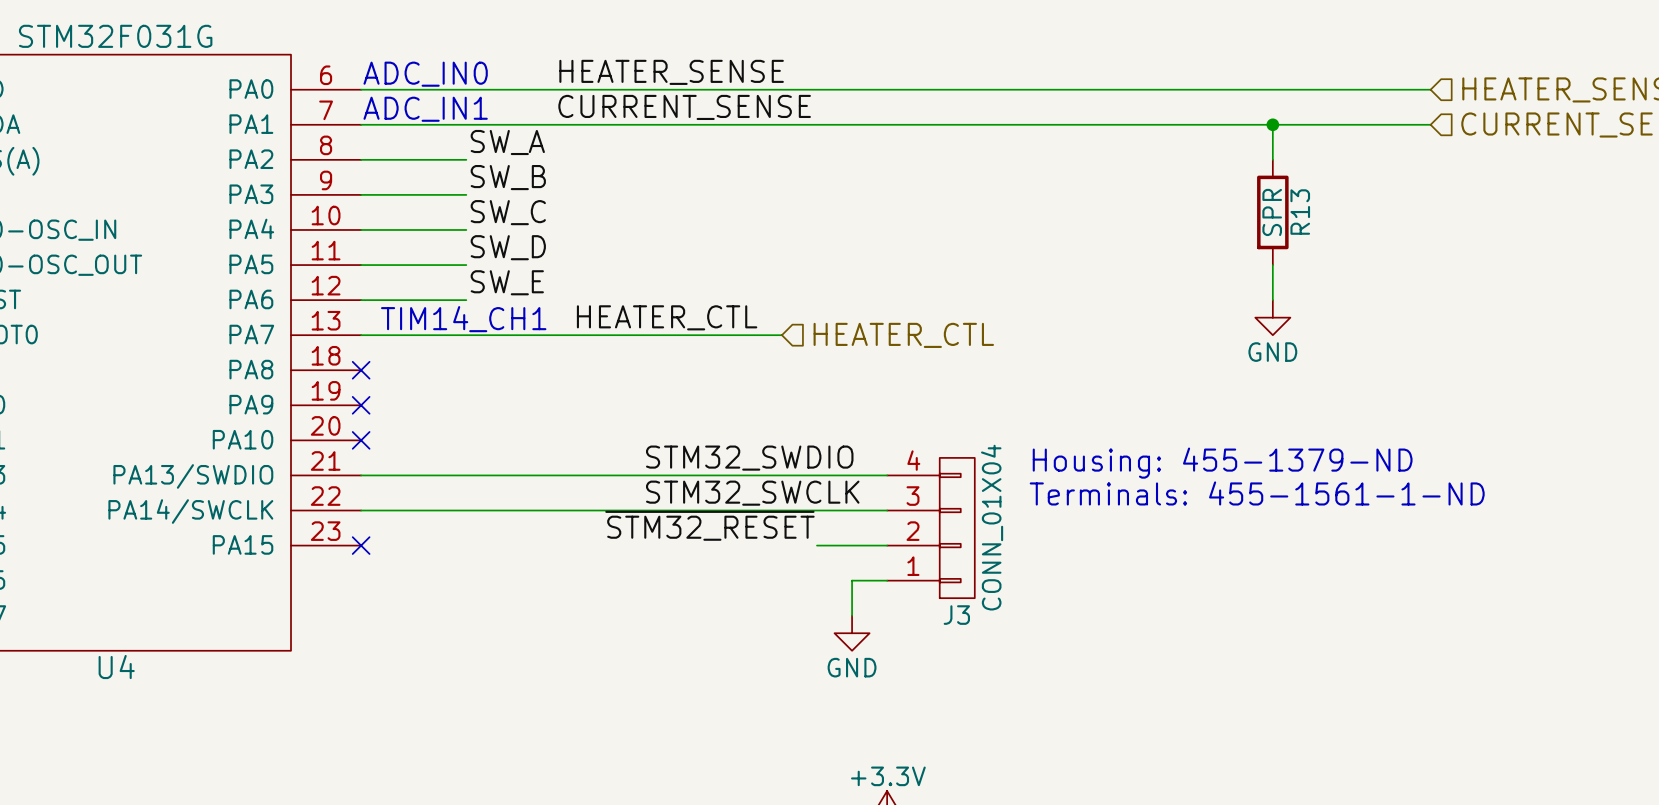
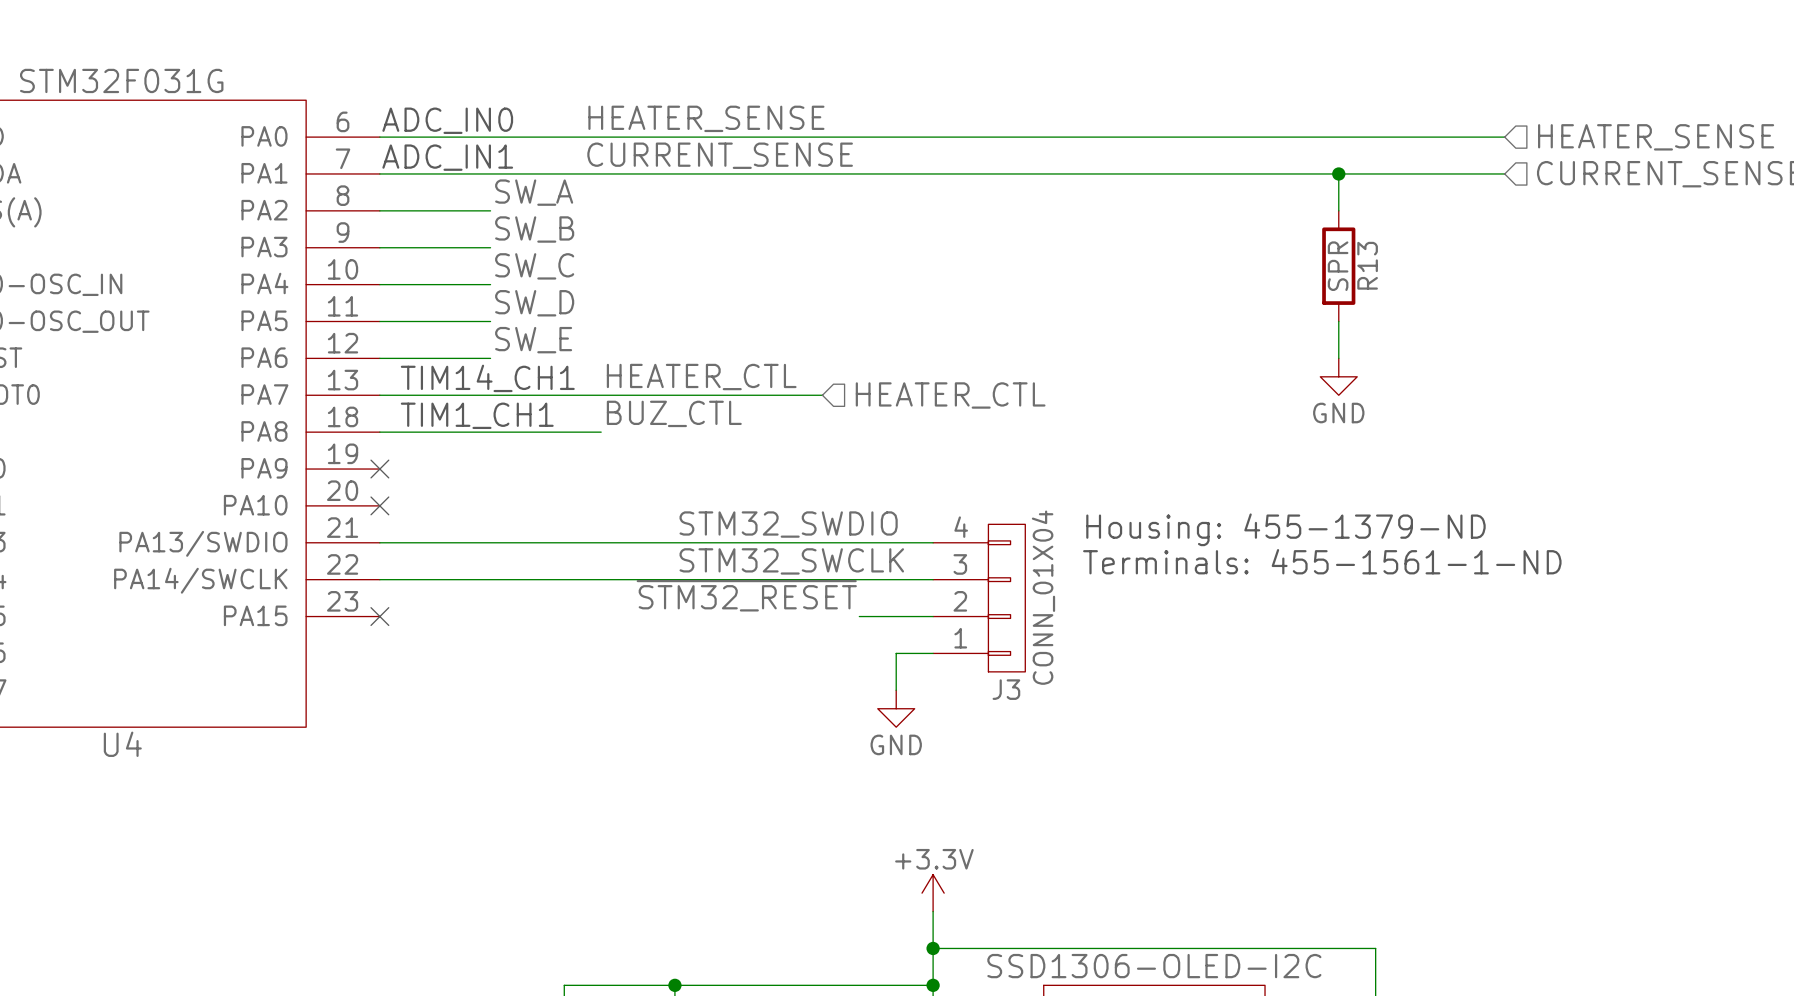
label: none -> BUZ_CTL (674, 413)
text: none -> TIM1_CH1 (477, 415)
wire: none -> (379, 432) (601, 432)
no-connect mark: (361, 370) -> none

